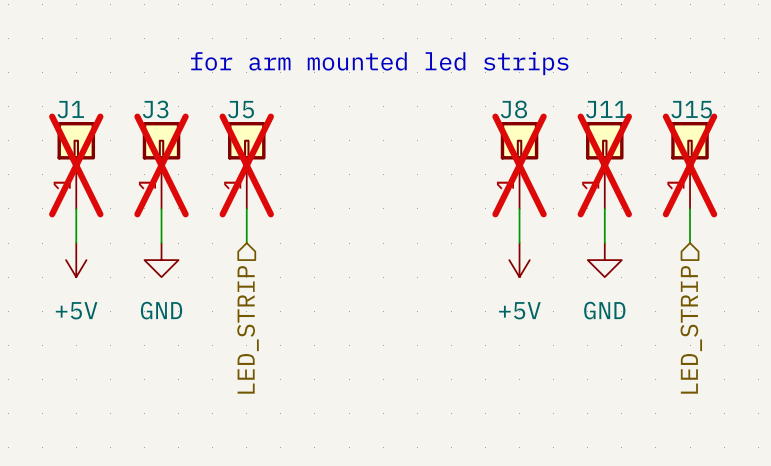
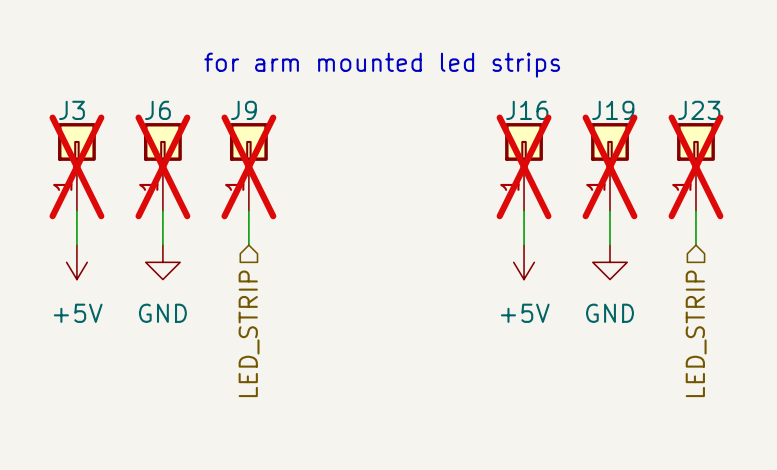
J1 name: J1 (70, 109) -> J3 (71, 110)
J3 name: J3 (155, 109) -> J6 (157, 110)
J5 name: J5 (241, 109) -> J9 (243, 110)
J8 name: J8 (513, 109) -> J16 (527, 110)
J11 name: J11 (606, 109) -> J19 (613, 110)
J15 name: J15 (691, 109) -> J23 (699, 110)

